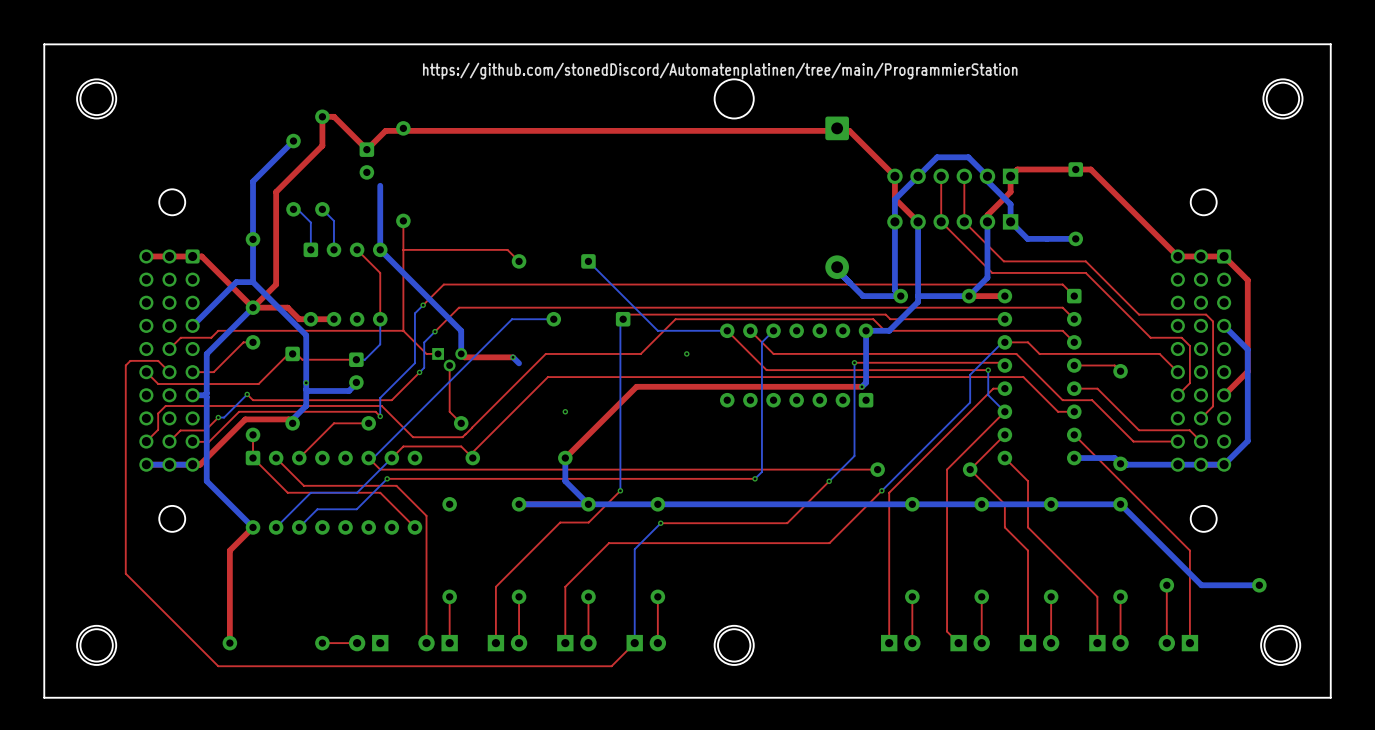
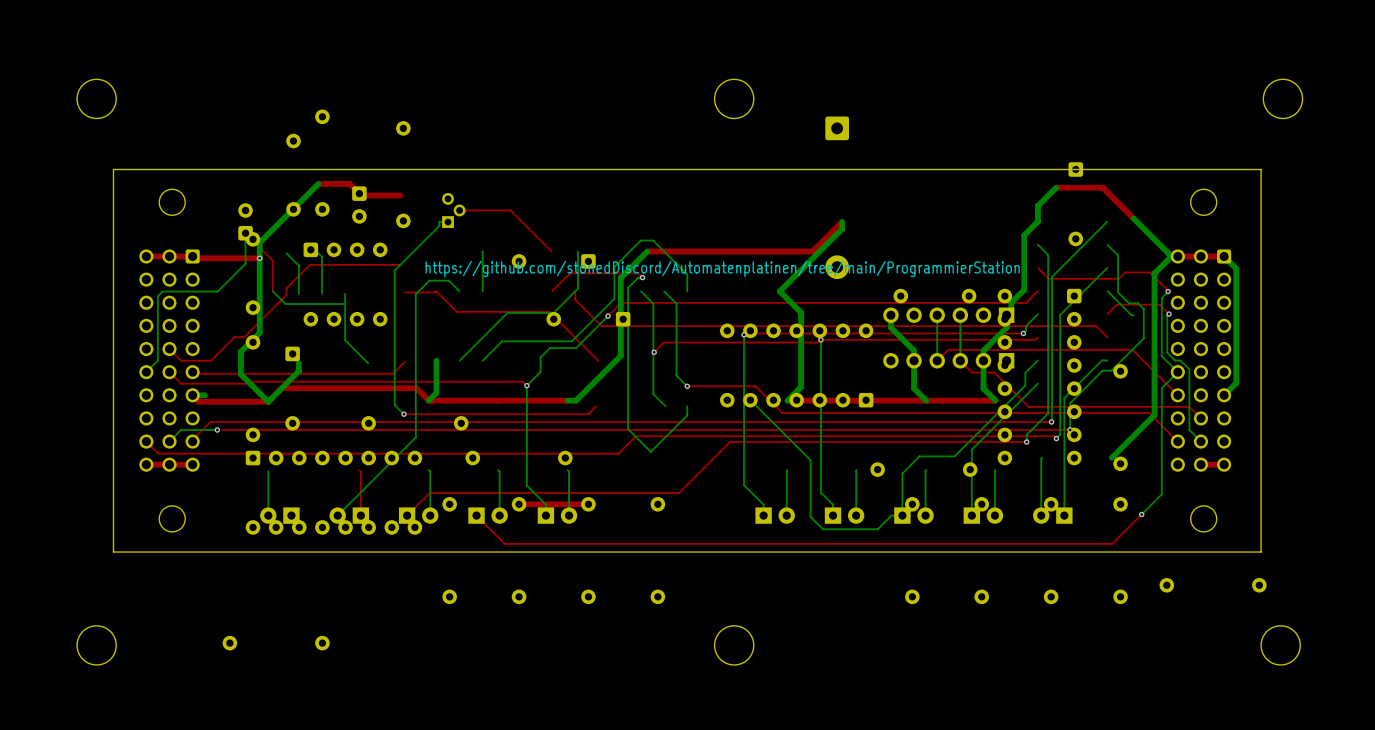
board edge: (1330, 44) (44, 44) (44, 697) (1330, 697) (1330, 44) -> (1261, 169) (1261, 552) (113, 552) (113, 169) (1261, 169)
text position: https://github.com/stonedDiscord/Automatenplatinen/tree/main/ProgrammierStation (720, 71) -> https://github.com/stonedDiscord/Automatenplatinen/tree/main/ProgrammierStation (722, 269)
round board edge: [80, 82, 114, 116] -> none
round board edge: [1266, 82, 1300, 116] -> none
top track: (837, 128) (834, 130) (385, 130) (366, 149) -> none
top track: (836, 130) (849, 130) (894, 176) (894, 198) (918, 221) -> none
bottom track: (293, 141) (253, 181) (253, 282) -> none
top track: (366, 149) (334, 116) (322, 116) (322, 145) (276, 191) (276, 284) (253, 307) -> none
part position: (366, 161) -> (359, 205)
top track: (941, 176) (941, 221) (992, 272) (1085, 272) (1150, 337) (1181, 337) (1189, 345) (1189, 383) (1177, 395) -> (937, 360) (948, 349) (1132, 349) (1177, 395)
part: (952, 176) -> none
top track: (964, 176) (964, 221) (1003, 261) (1085, 261) (1139, 314) (1206, 314) (1213, 321) (1213, 406) (1200, 418) -> (960, 360) (972, 372) (994, 372) (1028, 406) (1189, 406) (1200, 418)
top track: none -> (318, 183) (349, 183) (361, 195) (400, 195)
bottom track: none -> (318, 183) (259, 242) (259, 332) (240, 351) (240, 374) (268, 401) (298, 371) (298, 363)
bottom track: (380, 185) (380, 249) (461, 330) (461, 353) -> none
top track: none -> (1056, 187) (1102, 187) (1133, 218)
bottom track: none -> (1056, 187) (1037, 205) (1037, 221) (1024, 235) (1024, 289) (1011, 302) (1011, 310) (1006, 315) (1006, 327) (983, 350) (983, 388) (995, 400)
bottom track: (293, 209) (297, 209) (310, 222) (310, 249) -> none
bottom track: (322, 209) (333, 220) (333, 249) -> none
top track: none -> (459, 210) (510, 210) (551, 251)
bottom track: none -> (1133, 218) (1171, 256)
top track: (403, 220) (403, 330) -> none
part: none -> (245, 221)
top track: none -> (842, 221) (812, 251) (647, 251)
bottom track: none -> (842, 221) (842, 229) (779, 291) (801, 312) (801, 386) (787, 400)
bottom track: (918, 221) (918, 301) (889, 330) (866, 330) (866, 382) (861, 386) -> none
part: (952, 221) -> none
top track: (987, 221) (987, 215) (1010, 192) (1010, 176) (1017, 169) (1090, 169) (1177, 256) -> none
bottom track: (987, 221) (987, 277) (969, 296) (918, 296) -> none
bottom track: none -> (1107, 221) (1052, 276) (1051, 422)
bottom track: none -> (448, 222) (439, 222) (439, 225) (394, 270) (394, 405) (404, 414)
top track: none -> (245, 233) (272, 260) (272, 291)
bottom track: none -> (245, 233) (245, 263) (217, 291) (162, 291) (157, 296) (157, 360) (146, 372)
bottom track: (1075, 238) (1027, 238) (1010, 221) (1010, 204) (987, 181) (987, 176) (968, 157) (937, 157) (894, 199) (894, 290) (900, 296) (863, 296) (836, 269) -> none
bottom track: none -> (1037, 244) (1048, 254) (1048, 413) (1026, 434) (1026, 442)
bottom track: none -> (1107, 244) (1118, 255) (1118, 292) (1129, 303) (1138, 303) (1143, 309) (1143, 338) (1111, 370) (1102, 370) (1070, 403) (1070, 429)
top track: (357, 249) (380, 272) (380, 319) -> none
top track: (403, 249) (507, 249) (519, 261) -> none
bottom track: none -> (482, 251) (482, 291)
bottom track: none -> (577, 251) (577, 288) (553, 312) (507, 312) (459, 360)
bottom track: none -> (647, 251) (620, 278) (620, 355) (576, 400) (567, 400)
bottom track: none -> (286, 253) (298, 265) (298, 293)
bottom track: none -> (318, 253) (321, 256) (321, 293)
top track: (192, 256) (201, 256) (253, 307) -> (192, 256) (194, 258) (259, 258)
bottom track: none -> (1171, 256) (1154, 273) (1154, 415) (1111, 457)
top track: (1224, 256) (1247, 280) (1247, 371) (1224, 395) -> none
bottom track: none -> (1224, 256) (1236, 268) (1236, 383) (1224, 395)
via: none -> (259, 258)
bottom track: (588, 261) (657, 330) (727, 330) -> none
top track: none -> (1037, 267) (1048, 278) (1118, 278) (1125, 272) (1149, 272) (1168, 291)
bottom track: none -> (1107, 267) (1060, 315) (1060, 434) (1056, 438)
top track: none -> (642, 277) (638, 273) (570, 273) (552, 291)
bottom track: none -> (642, 277) (638, 277) (628, 287) (628, 429) (650, 451) (687, 415) (687, 406)
via: none -> (642, 277)
bottom track: (253, 282) (236, 282) (192, 325) -> none
bottom track: (253, 282) (306, 335) (306, 405) (292, 419) (292, 423) -> none
bottom track: none -> (272, 291) (285, 304) (345, 304)
bottom track: none -> (459, 291) (448, 280) (429, 280) (415, 294) (415, 437) (337, 515)
top track: none -> (575, 291) (575, 299) (601, 326) (1096, 326) (1107, 337)
bottom track: none -> (641, 291) (653, 303) (653, 394) (665, 406)
bottom track: none -> (664, 291) (676, 303) (676, 375) (687, 386)
bottom track: none -> (687, 291) (687, 274) (653, 240) (640, 240) (614, 266) (614, 298) (571, 341) (502, 341) (482, 360)
top track: none -> (1037, 291) (1026, 302) (621, 302) (608, 316)
bottom track: none -> (1107, 291) (1133, 315)
bottom track: none -> (1168, 291) (1161, 297) (1161, 356) (1177, 372) (1161, 388) (1161, 494) (1141, 514)
via: none -> (1168, 291)
top track: none -> (404, 292) (436, 291) (456, 311) (549, 311) (598, 360)
bottom track: none -> (345, 293) (345, 340) (368, 363)
top track: (1004, 296) (969, 296) -> none
top track: (1074, 296) (1062, 284) (443, 284) (423, 305) -> none
bottom track: (423, 305) (414, 313) (414, 363) (380, 397) (380, 416) -> none
via: (423, 305) -> none
top track: (253, 307) (287, 307) (299, 319) (333, 319) -> none
bottom track: (253, 307) (206, 353) (206, 393) (205, 395) (206, 397) (206, 481) (253, 527) -> none
bottom track: none -> (1037, 314) (1026, 326) (1026, 330) (1023, 333)
top track: none -> (1169, 314) (1159, 304) (1116, 304) (1107, 314)
bottom track: none -> (1169, 314) (1167, 315) (1167, 352) (1175, 360) (1180, 360) (1189, 369) (1189, 429) (1200, 441)
via: none -> (1169, 314)
bottom track: none -> (890, 315) (890, 327) (914, 350) (914, 388) (926, 400)
bottom track: none -> (937, 315) (937, 360)
part: none -> (948, 315)
bottom track: none -> (960, 315) (960, 360)
bottom track: none -> (608, 316) (576, 348) (550, 348) (540, 357) (540, 372) (526, 385) (526, 485) (545, 504) (545, 515)
via: none -> (608, 316)
top track: (625, 316) (627, 314) (885, 314) (890, 319) (1004, 319) -> none
bottom track: (380, 319) (380, 344) (364, 359) (356, 359) -> none
bottom track: (553, 319) (512, 319) (373, 458) -> none
top track: (1074, 319) (1062, 307) (458, 307) (435, 331) -> none
bottom track: (620, 321) (620, 490) -> none
bottom track: (1224, 325) (1247, 349) (1247, 441) (1224, 464) (1127, 464) (1120, 463) (1114, 458) (1074, 458) -> none
top track: (403, 330) (218, 330) (211, 337) (180, 337) (169, 349) -> (400, 264) (309, 264) (286, 288) (286, 294) (244, 337) (234, 337) (210, 360) (181, 360) (169, 349)
top track: (403, 330) (426, 353) (438, 353) -> none
top track: (727, 330) (766, 370) (988, 370) -> none
top track: (750, 330) (773, 353) (1016, 353) (1062, 400) (1092, 400) (1133, 441) (1177, 441) -> (687, 386) (755, 386) (782, 412) (1149, 412) (1177, 441)
bottom track: (773, 330) (761, 342) (761, 471) (755, 478) -> none
bottom track: (435, 331) (424, 342) (424, 367) (419, 372) -> none
via: (435, 331) -> none
top track: none -> (1023, 333) (744, 334)
via: none -> (1023, 333)
bottom track: none -> (744, 334) (744, 485) (763, 504) (763, 515)
via: none -> (744, 334)
top track: none -> (1037, 337) (1035, 339) (820, 339) (818, 342) (663, 342) (654, 352)
bottom track: none -> (820, 339) (820, 492) (833, 504) (833, 515)
via: none -> (820, 339)
top track: (253, 342) (243, 342) (213, 372) (192, 372) -> (404, 361) (392, 373) (194, 373) (192, 372)
top track: (1004, 342) (1028, 342) (1039, 353) (1159, 353) (1177, 372) -> none
bottom track: (1004, 342) (1002, 342) (970, 374) (970, 402) (881, 490) -> none
top track: (1074, 342) (1062, 330) (884, 330) (873, 319) (675, 319) (640, 353) (545, 353) (462, 437) (413, 437) (381, 405) (165, 405) (158, 413) (158, 429) (146, 441) -> (1056, 438) (1054, 436) (635, 436) (618, 453) (158, 453) (146, 441)
via: none -> (654, 352)
top track: (461, 353) (464, 357) (513, 357) -> none
via: (686, 353) -> none
bottom track: (513, 357) (519, 363) -> none
via: (513, 357) -> none
top track: (356, 359) (356, 365) (350, 359) (302, 359) (296, 353) (288, 353) (258, 384) (158, 384) (146, 372) -> none
part rotation: 0° (449, 359) -> 90° counterclockwise (453, 210)
part position: (449, 359) -> (453, 210)
bottom track: none -> (436, 360) (436, 393) (428, 400)
part: none -> (948, 360)
bottom track: none -> (1037, 360) (1025, 372) (1025, 385) (954, 456) (919, 456) (902, 473) (902, 515) (891, 515) (877, 529) (822, 529) (810, 516) (810, 460) (756, 406)
bottom track: none -> (1107, 360) (1102, 360) (1064, 398) (1064, 515)
bottom track: (854, 362) (854, 456) (829, 481) -> none
via: (854, 362) -> none
top track: (1002, 362) (854, 362) -> none
top track: (449, 365) (449, 411) (461, 423) -> none
top track: (1074, 365) (1114, 365) (1120, 371) -> none
bottom track: (988, 370) (988, 395) (1004, 411) -> none
via: (988, 370) -> none
part: (356, 371) -> none
top track: (169, 372) (158, 360) (130, 360) (125, 365) (125, 573) (218, 666) (611, 666) (634, 643) -> (169, 372) (181, 383) (247, 383) (249, 381) (522, 381) (526, 385)
via: (419, 372) -> none
top track: (420, 372) (391, 400) (253, 400) (247, 394) -> none
via: (306, 382) -> none
bottom track: (356, 382) (348, 391) (306, 389) -> none
bottom track: none -> (1037, 383) (971, 449) (971, 515)
via: none -> (526, 385)
via: none -> (687, 386)
top track: (861, 386) (636, 386) (565, 458) -> none
via: (861, 386) -> none
top track: (1004, 388) (993, 388) (889, 492) (889, 643) -> none
top track: (1074, 388) (1097, 388) (1139, 430) (1189, 430) (1200, 441) -> none
bottom track: (247, 394) (224, 417) (218, 417) -> none
via: (247, 394) -> none
top track: none -> (192, 395) (199, 401) (268, 401) (281, 388) (416, 388) (428, 400) (567, 400)
top track: none -> (995, 400) (787, 400)
top track: none -> (596, 406) (588, 414) (404, 414)
via: (565, 411) -> none
top track: (1004, 411) (947, 469) (947, 631) (958, 643) -> none
top track: (1074, 411) (1058, 411) (1023, 377) (547, 377) (472, 452) (472, 458) (461, 446) (403, 446) (391, 458) -> none
via: none -> (404, 414)
top track: (380, 416) (375, 411) (239, 411) (209, 441) (192, 441) -> (1051, 422) (210, 422) (192, 441)
via: (380, 416) -> none
top track: (218, 417) (205, 430) (180, 430) (169, 441) -> none
via position: (218, 417) -> (217, 429)
via: none -> (1051, 422)
top track: (292, 423) (288, 419) (245, 419) (200, 464) (194, 464) -> none
top track: (368, 423) (333, 423) (299, 458) -> none
bottom track: none -> (217, 429) (181, 429) (169, 441)
top track: none -> (1070, 429) (222, 429)
via: none -> (1070, 429)
top track: (253, 434) (253, 458) (287, 492) (380, 492) (414, 527) -> none
top track: (1004, 434) (970, 469) (1004, 504) (1004, 527) (1028, 550) (1028, 643) -> none
top track: (1074, 434) (1189, 550) (1189, 643) -> none
via: none -> (1056, 438)
top track: none -> (1026, 442) (730, 442) (679, 492) (429, 492) (407, 515)
via: none -> (1026, 442)
bottom track: none -> (1042, 457) (1041, 515)
top track: (276, 458) (303, 485) (396, 485) (426, 515) (426, 643) -> none
top track: (368, 458) (380, 469) (877, 469) -> none
bottom track: (391, 458) (357, 492) (310, 492) (276, 527) -> none
bottom track: (565, 458) (565, 481) (588, 504) -> none
top track: (1004, 458) (1028, 481) (1028, 527) (1097, 596) (1097, 643) -> none
bottom track: (192, 464) (146, 464) -> none
top track: none -> (359, 470) (360, 515)
bottom track: none -> (428, 470) (430, 515)
bottom track: none -> (498, 470) (499, 515)
bottom track: none -> (567, 470) (569, 515)
bottom track: none -> (787, 470) (786, 515)
bottom track: none -> (856, 470) (856, 515)
bottom track: none -> (926, 470) (925, 515)
bottom track: none -> (995, 470) (994, 515)
bottom track: none -> (268, 471) (268, 515)
bottom track: (387, 478) (356, 509) (317, 509) (299, 527) -> none
via: (387, 478) -> none
top track: (755, 478) (387, 478) -> none
via: (755, 478) -> none
top track: (829, 481) (787, 523) (660, 523) -> none
via: (829, 481) -> none
top track: (620, 490) (588, 522) (560, 522) (495, 586) (495, 643) -> none
via: (620, 490) -> none
top track: (881, 490) (829, 543) (608, 543) (565, 586) (565, 643) -> none
via: (881, 490) -> none
bottom track: (981, 504) (519, 504) -> none
bottom track: (982, 504) (1120, 504) (1201, 585) (1259, 585) -> none
top track: none -> (1141, 514) (1112, 543) (504, 543) (476, 515)
via: none -> (1141, 514)
part: none -> (279, 515)
part: none -> (349, 515)
part: none -> (418, 515)
part: none -> (488, 515)
part: none -> (557, 515)
part: none -> (775, 515)
part: none -> (844, 515)
part: none -> (913, 515)
part: none -> (983, 515)
part: none -> (1052, 515)
bottom track: (660, 523) (634, 549) (634, 643) -> none
via: (660, 523) -> none
top track: (253, 527) (229, 550) (229, 643) -> none
top track: (1166, 585) (1166, 643) -> none
top track: (449, 596) (449, 643) -> none
top track: (519, 596) (519, 643) -> none
top track: (588, 596) (588, 643) -> none
top track: (657, 596) (657, 643) -> none
top track: (912, 596) (912, 643) -> none
top track: (981, 596) (981, 643) -> none
top track: (1051, 596) (1051, 643) -> none
top track: (1120, 596) (1120, 643) -> none
round board edge: [80, 628, 114, 662] -> none
round board edge: [717, 628, 751, 662] -> none
round board edge: [1264, 628, 1298, 662] -> none
top track: (357, 643) (322, 643) -> none
part: (368, 643) -> none
part: (438, 643) -> none
part: (507, 643) -> none
part: (576, 643) -> none
part: (646, 643) -> none
part: (900, 643) -> none
part: (970, 643) -> none
part: (1039, 643) -> none
part: (1108, 643) -> none
part: (1178, 643) -> none

